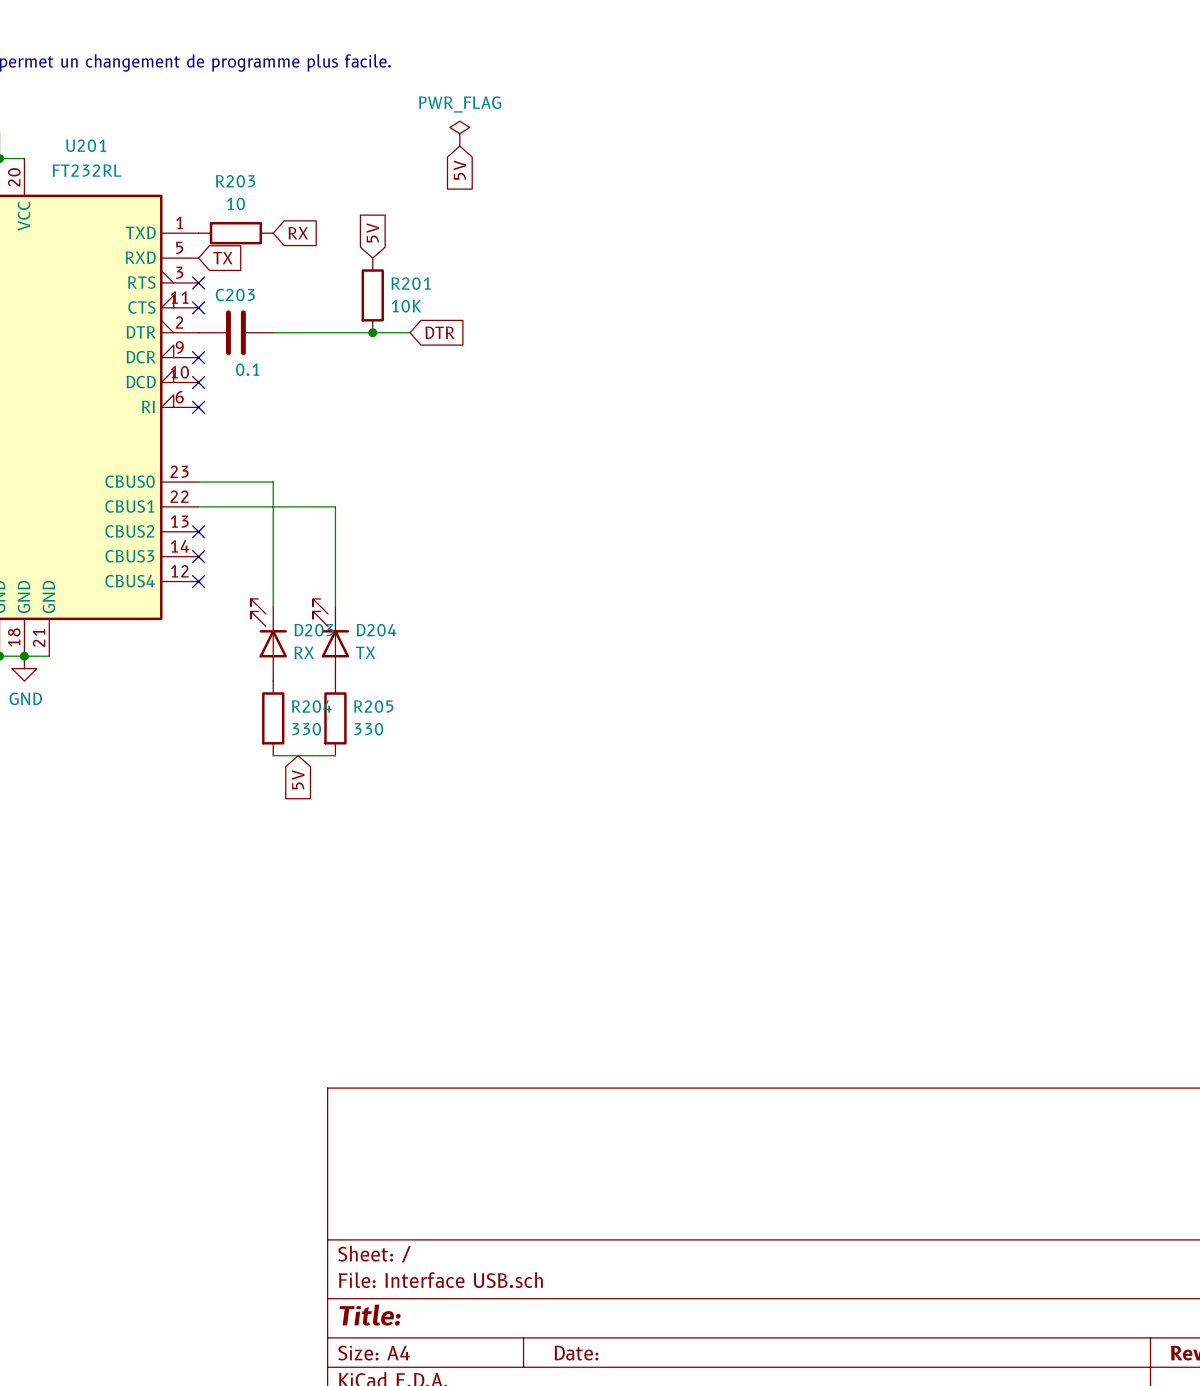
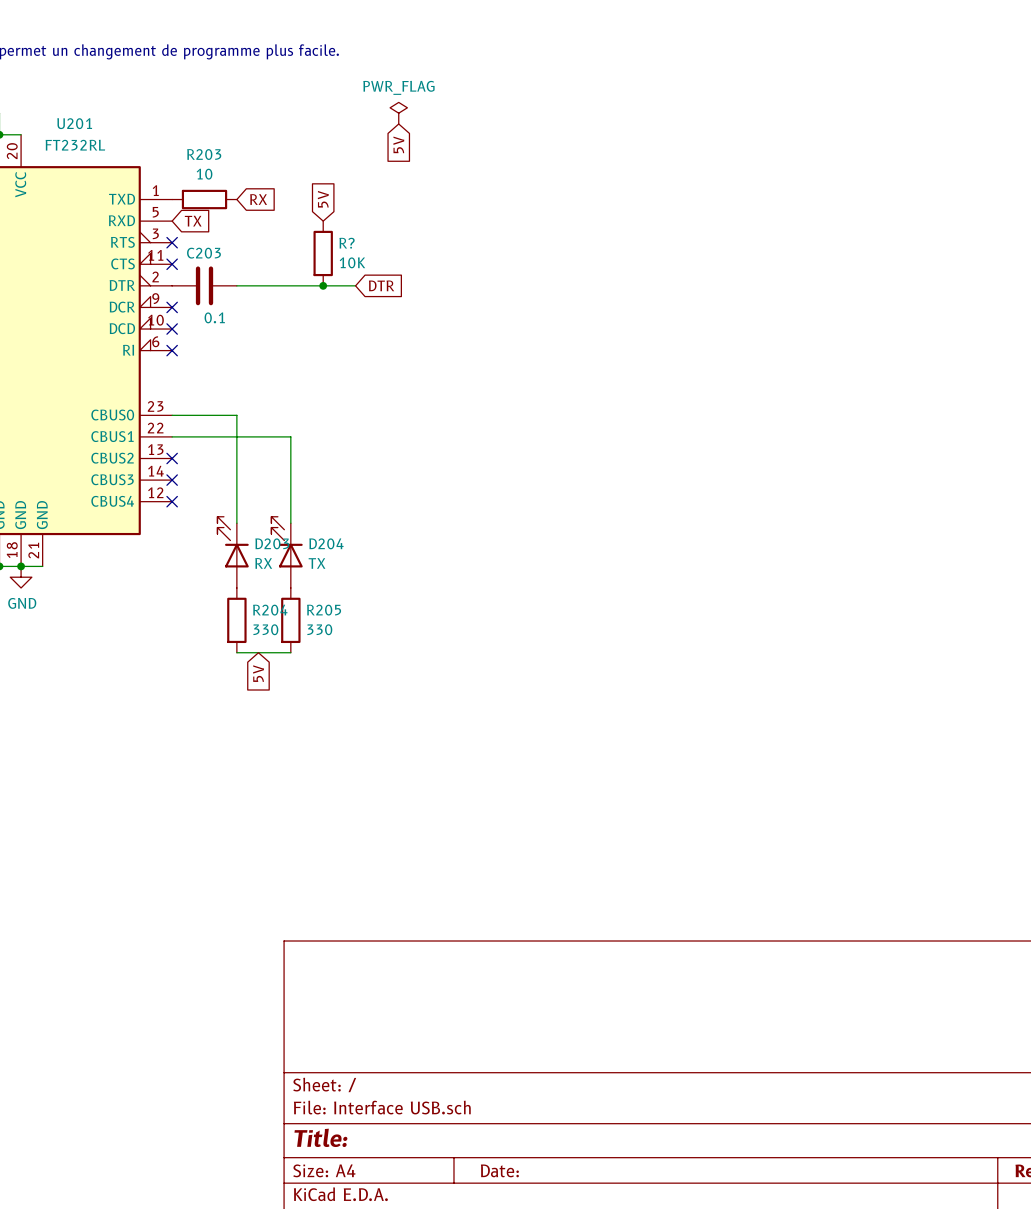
R201 name: R201 (411, 283) -> R? (347, 243)

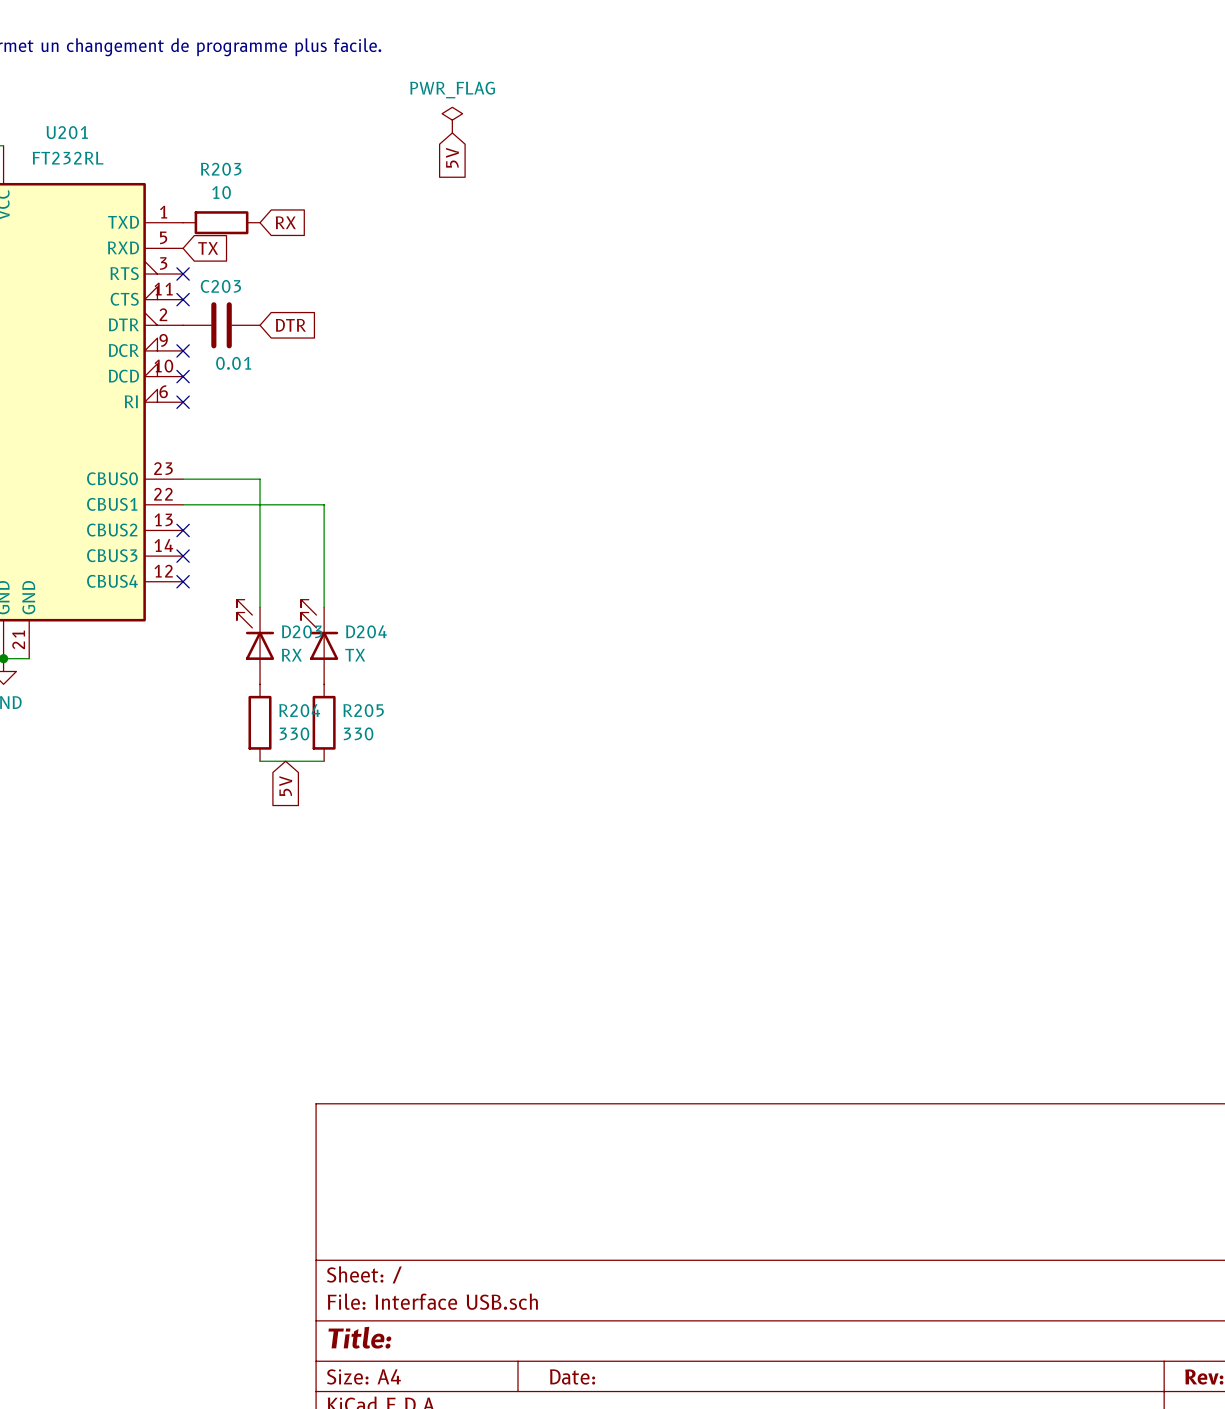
global label: 5V (323, 199) -> none
R?: 10K (323, 253) -> none
wire: (236, 285) (355, 285) -> none
junction: (323, 285) -> none
global label position: DTR (381, 285) -> DTR (290, 325)
C203 value: 0.1 (214, 317) -> 0.01 (233, 363)

